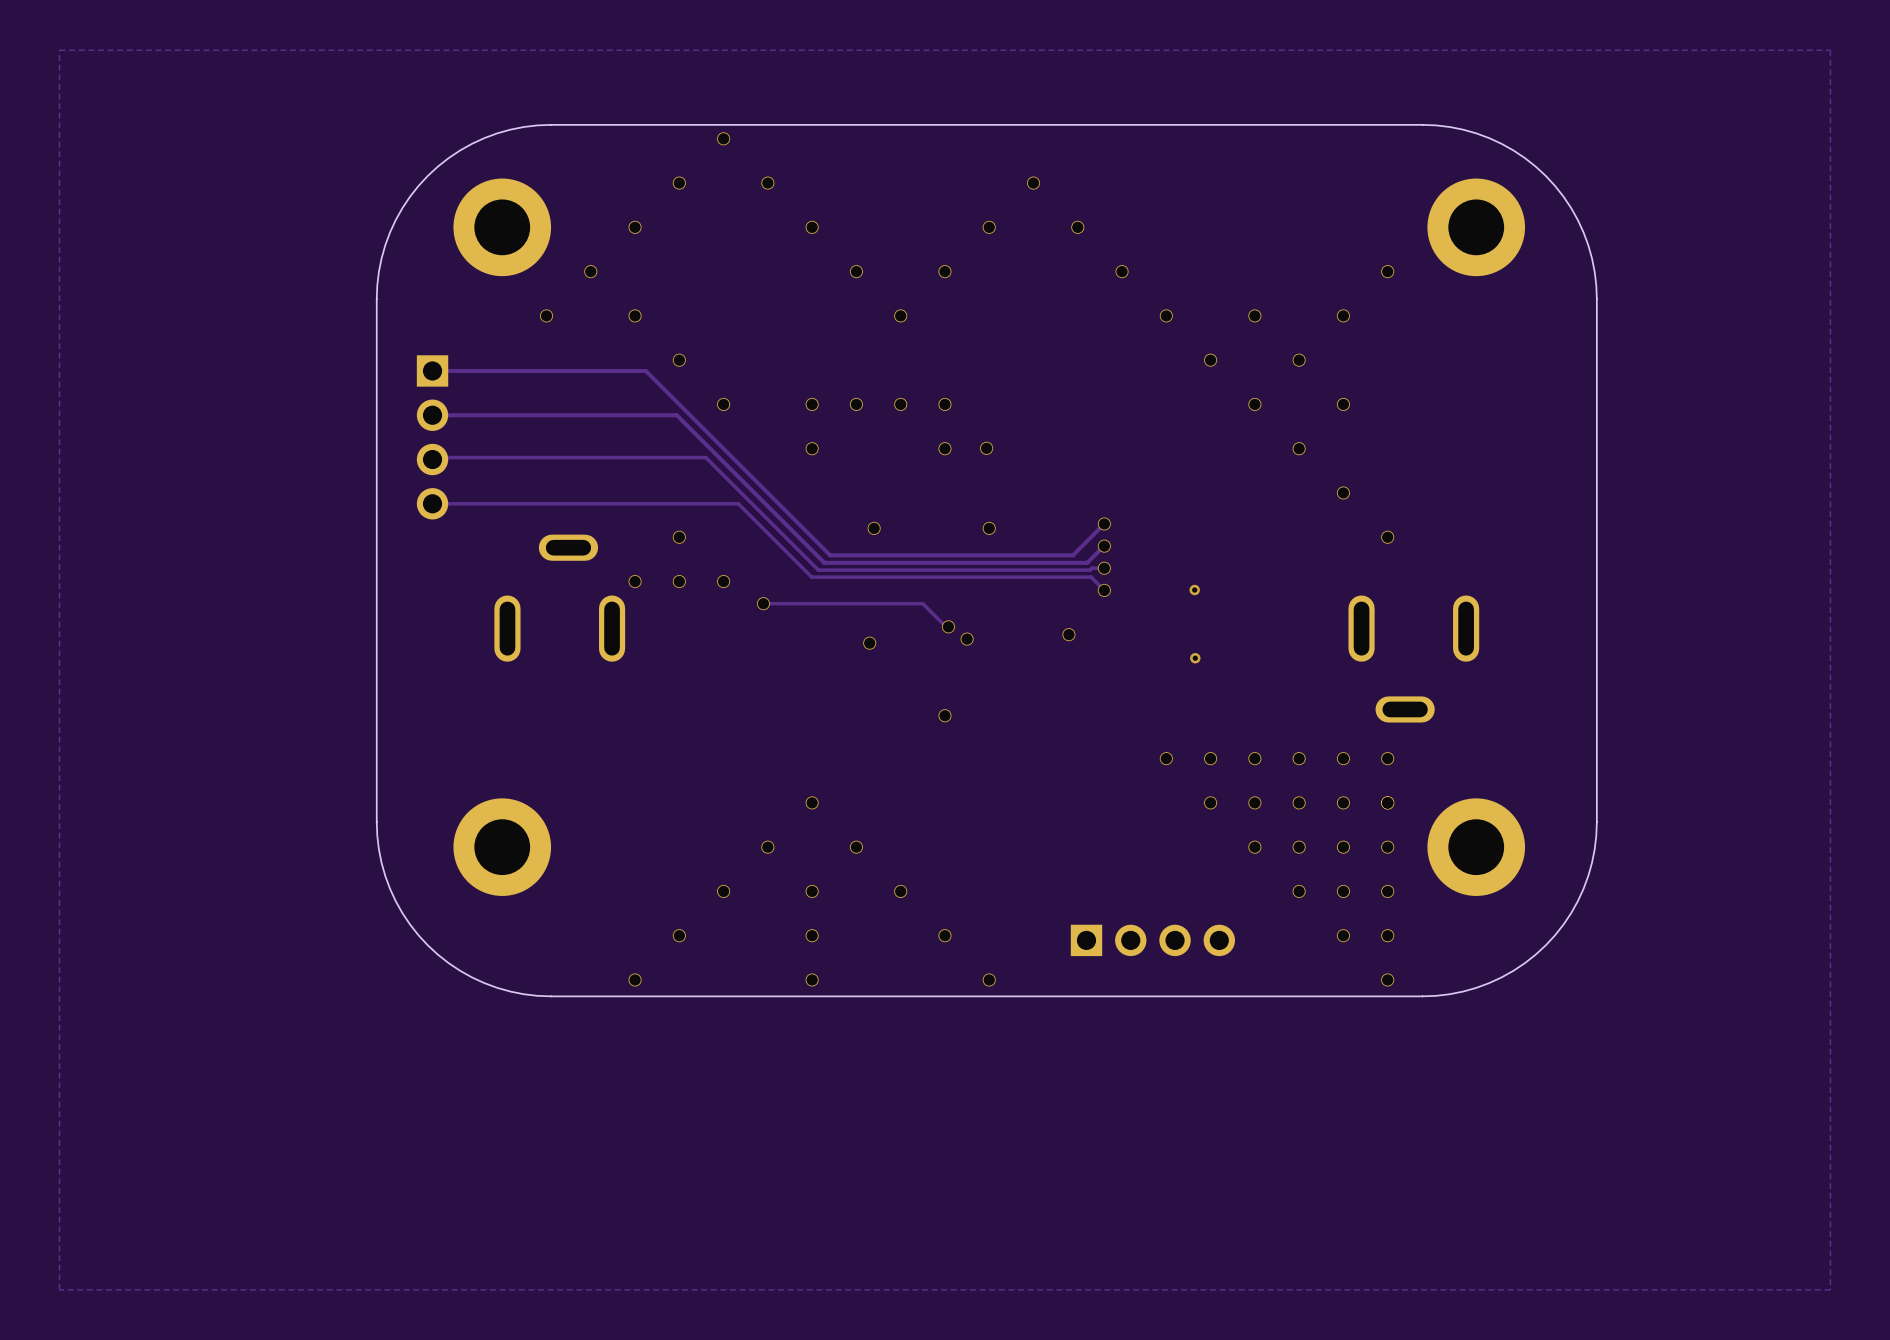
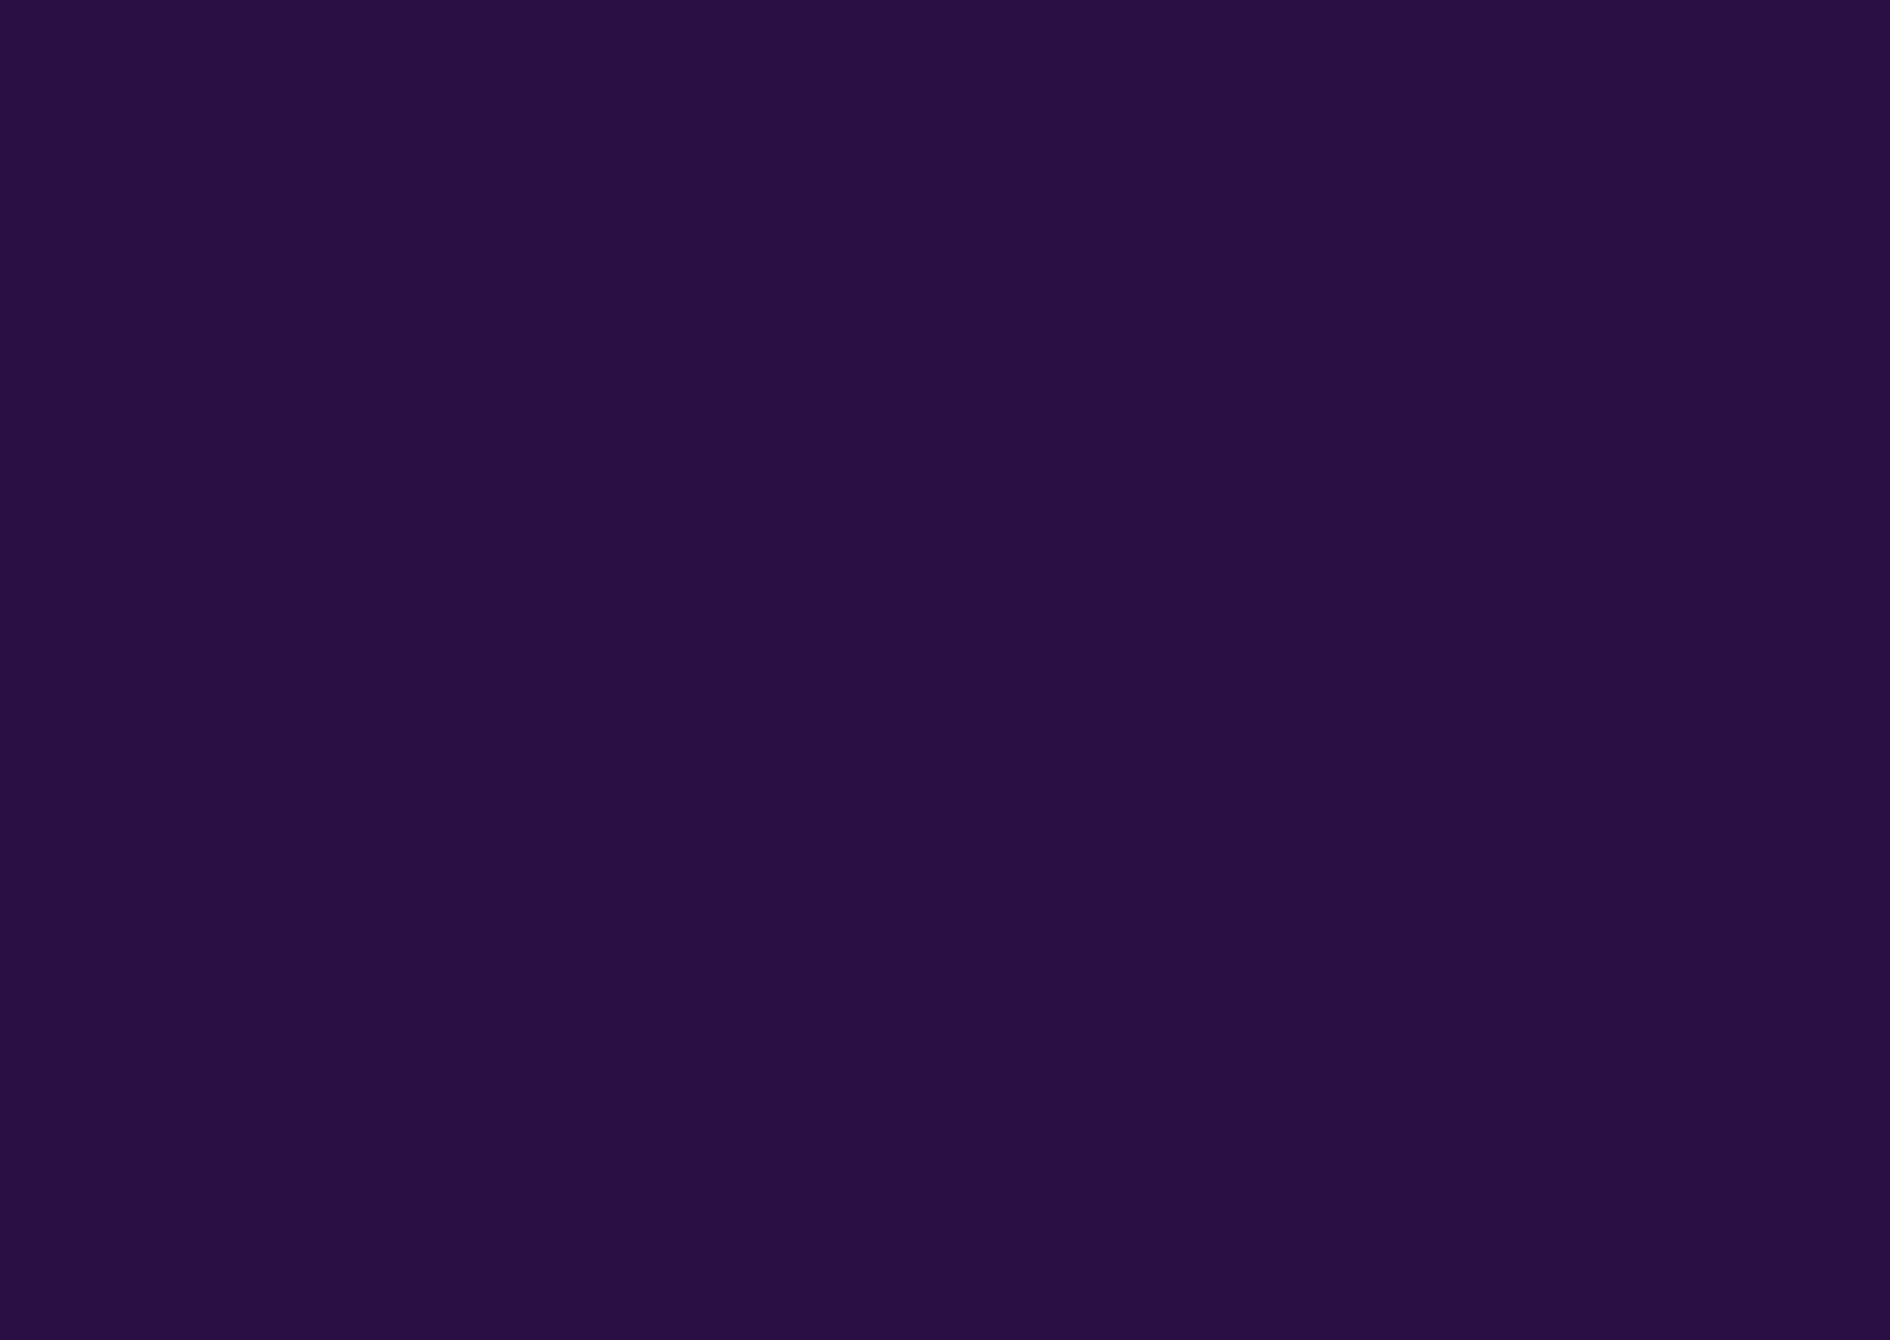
zone outline: (1830, 50) (1830, 1289) (59, 1289) (59, 50) (1830, 50) -> none
board edge: (1422, 124) (537, 125) (510, 129) (484, 138) (459, 150) (437, 166) (410, 196) (390, 232) (378, 271) (376, 299) (377, 835) (381, 862) (390, 888) (402, 913) (418, 935) (448, 963) (471, 977) (510, 991) (551, 996) (1436, 995) (1463, 991) (1489, 983) (1513, 970) (1535, 954) (1555, 935) (1577, 901) (1592, 862) (1596, 835) (1596, 299) (1594, 271) (1588, 245) (1571, 208) (1555, 185) (1535, 166) (1501, 143) (1476, 133) (1449, 127) (1422, 124) -> none
via: (723, 138) -> none
via: (679, 183) -> none
via: (767, 183) -> none
via: (1033, 183) -> none
part: (502, 227) -> none
via: (635, 227) -> none
via: (812, 227) -> none
via: (989, 227) -> none
via: (1077, 227) -> none
part: (1476, 227) -> none
via: (590, 271) -> none
via: (856, 271) -> none
via: (944, 271) -> none
via: (1122, 271) -> none
via: (1387, 271) -> none
via: (546, 315) -> none
via: (635, 315) -> none
via: (900, 315) -> none
via: (1166, 315) -> none
via: (1254, 315) -> none
via: (1343, 315) -> none
via: (679, 360) -> none
via: (1210, 360) -> none
via: (1299, 360) -> none
track: (432, 370) (645, 370) (830, 555) (1072, 555) (1104, 523) -> none
via: (723, 404) -> none
via: (812, 404) -> none
via: (856, 404) -> none
via: (900, 404) -> none
via: (944, 404) -> none
via: (1254, 404) -> none
via: (1343, 404) -> none
track: (432, 415) (676, 415) (824, 562) (1087, 562) (1104, 546) -> none
part: (432, 437) -> none
via: (812, 448) -> none
via: (944, 448) -> none
via: (986, 448) -> none
via: (1299, 448) -> none
track: (432, 459) (434, 457) (705, 457) (818, 570) (1090, 570) (1092, 568) (1104, 568) -> none
via: (1343, 492) -> none
track: (432, 503) (738, 503) (811, 577) (1091, 577) (1104, 590) -> none
via: (1104, 523) -> none
via: (874, 528) -> none
via: (989, 528) -> none
via: (679, 537) -> none
via: (1387, 537) -> none
via: (1104, 546) -> none
via: (1104, 568) -> none
via: (635, 581) -> none
via: (679, 581) -> none
via: (723, 581) -> none
via: (1104, 590) -> none
via: (1194, 590) -> none
part: (559, 598) -> none
track: (763, 603) (922, 603) (946, 626) (948, 626) -> none
via: (763, 603) -> none
via: (948, 626) -> none
via: (1068, 634) -> none
via: (967, 639) -> none
via: (869, 643) -> none
via: (1195, 658) -> none
part: (1413, 659) -> none
via: (944, 715) -> none
via: (1166, 758) -> none
via: (1210, 758) -> none
via: (1254, 758) -> none
via: (1299, 758) -> none
via: (1343, 758) -> none
via: (1387, 758) -> none
via: (812, 802) -> none
via: (1210, 802) -> none
via: (1254, 802) -> none
via: (1299, 802) -> none
via: (1343, 802) -> none
via: (1387, 802) -> none
part: (502, 847) -> none
via: (767, 847) -> none
via: (856, 847) -> none
via: (1254, 847) -> none
via: (1299, 847) -> none
via: (1343, 847) -> none
via: (1387, 847) -> none
part: (1476, 847) -> none
via: (723, 891) -> none
via: (812, 891) -> none
via: (900, 891) -> none
via: (1299, 891) -> none
via: (1343, 891) -> none
via: (1387, 891) -> none
via: (679, 935) -> none
via: (812, 935) -> none
via: (944, 935) -> none
via: (1343, 935) -> none
via: (1387, 935) -> none
part: (1152, 940) -> none
via: (635, 979) -> none
via: (812, 979) -> none
via: (989, 979) -> none
via: (1387, 979) -> none

